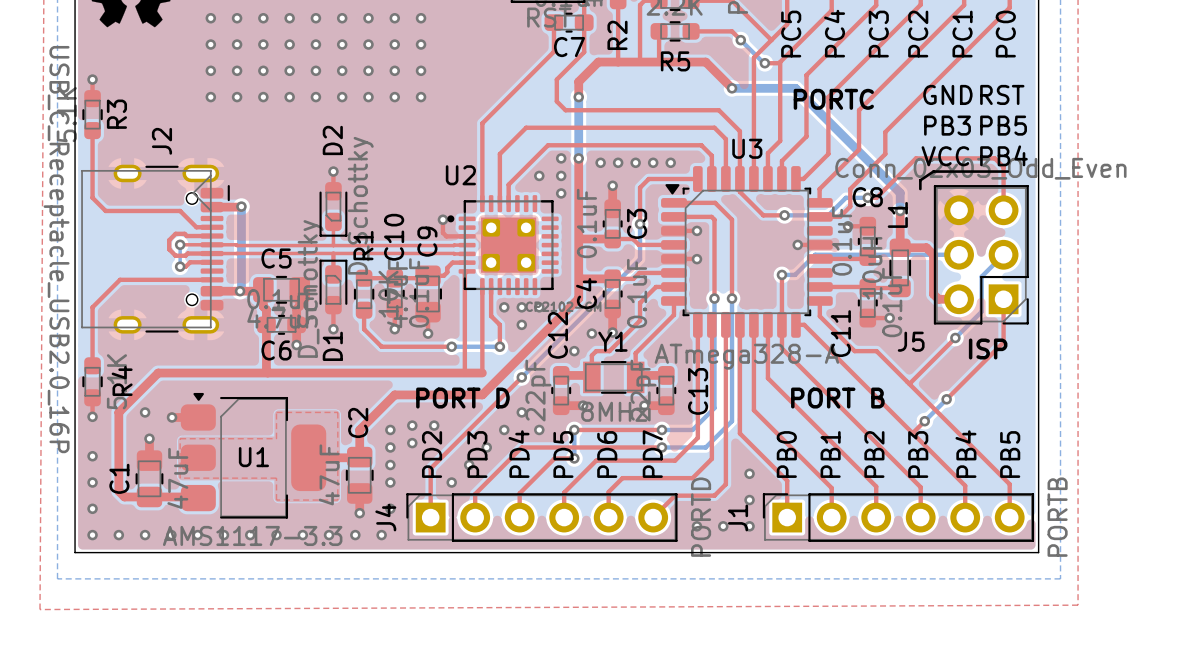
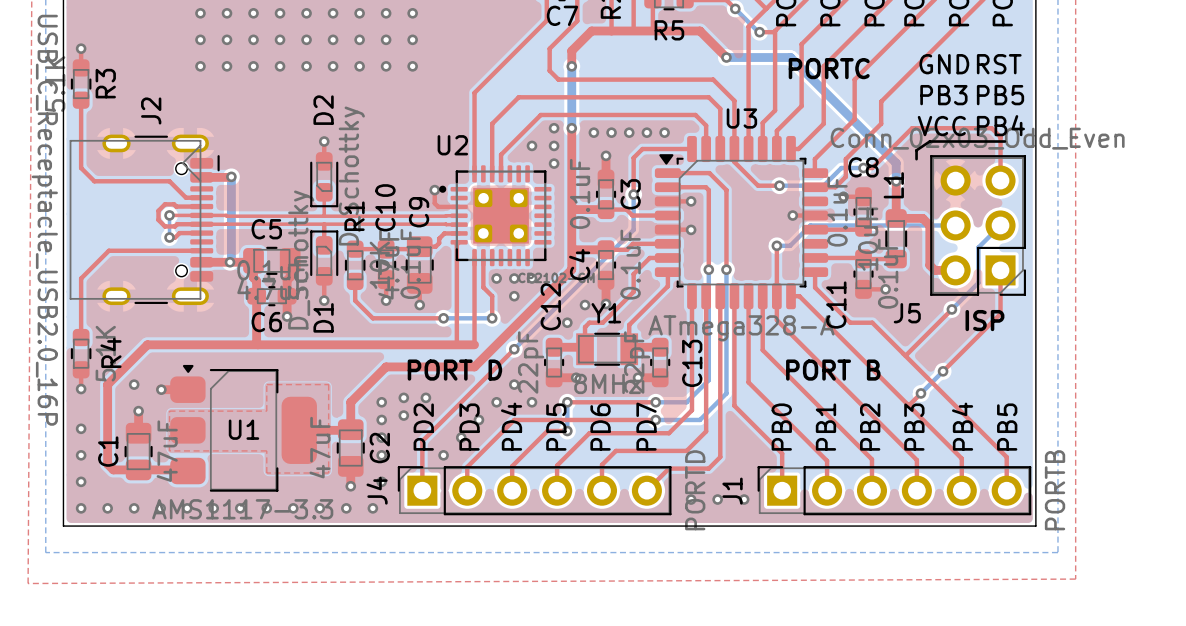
C2 name position: C2 (358, 422) -> C2 (379, 448)
via: (749, 473) -> none
via: (749, 500) -> none

